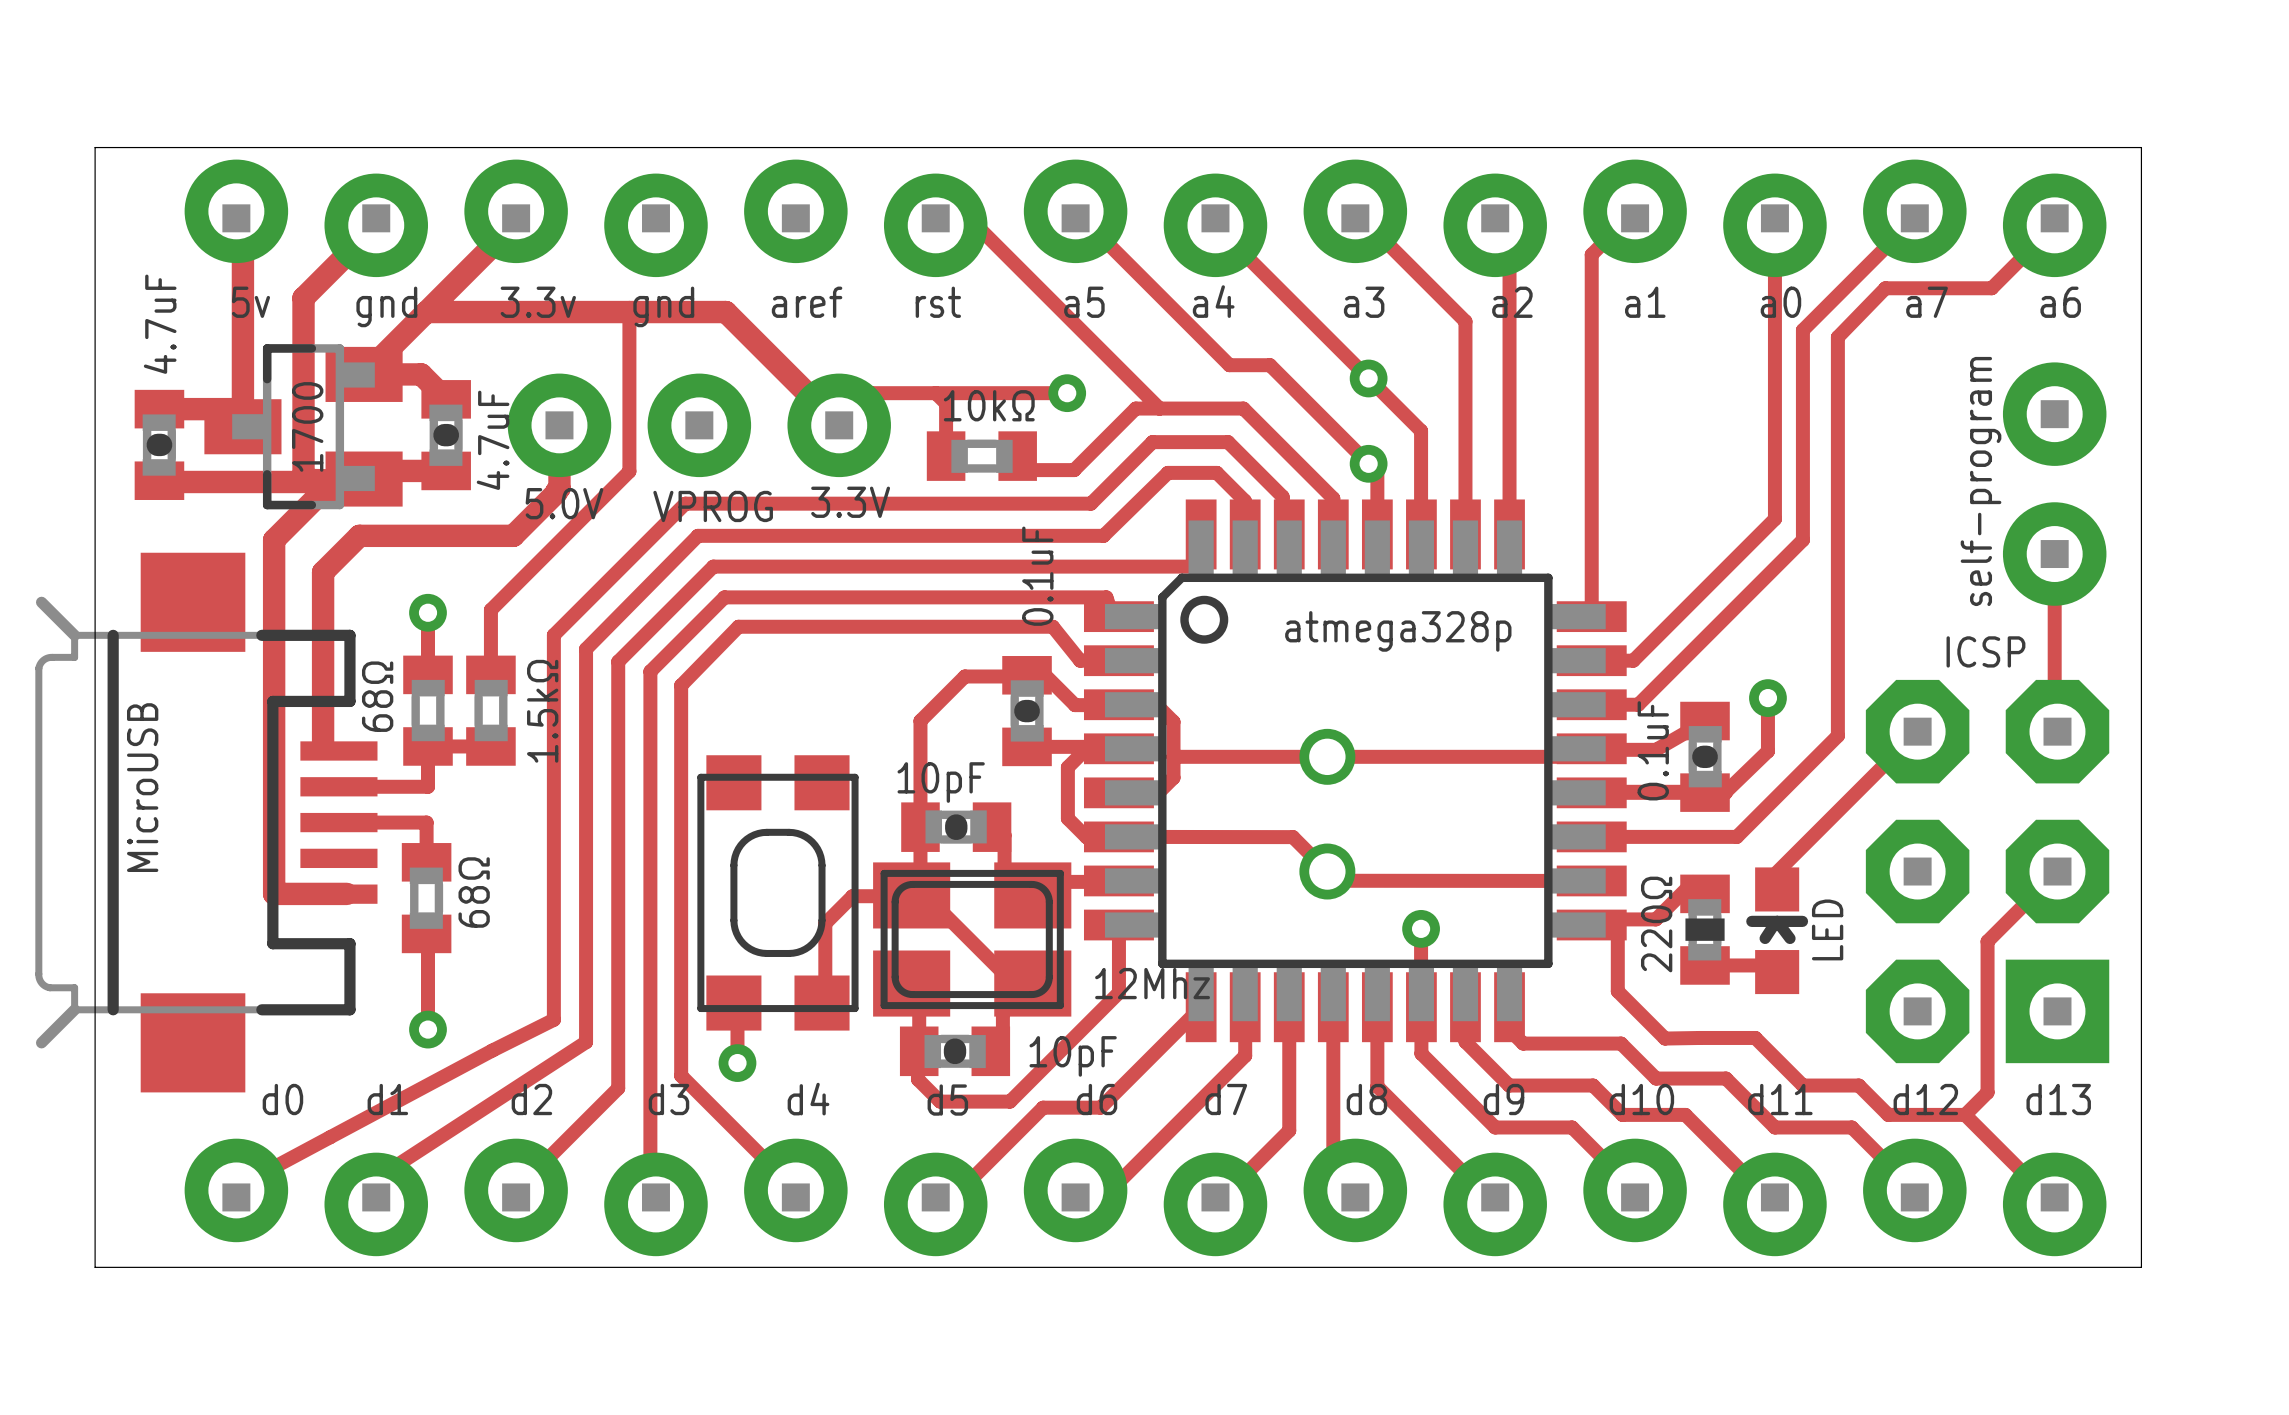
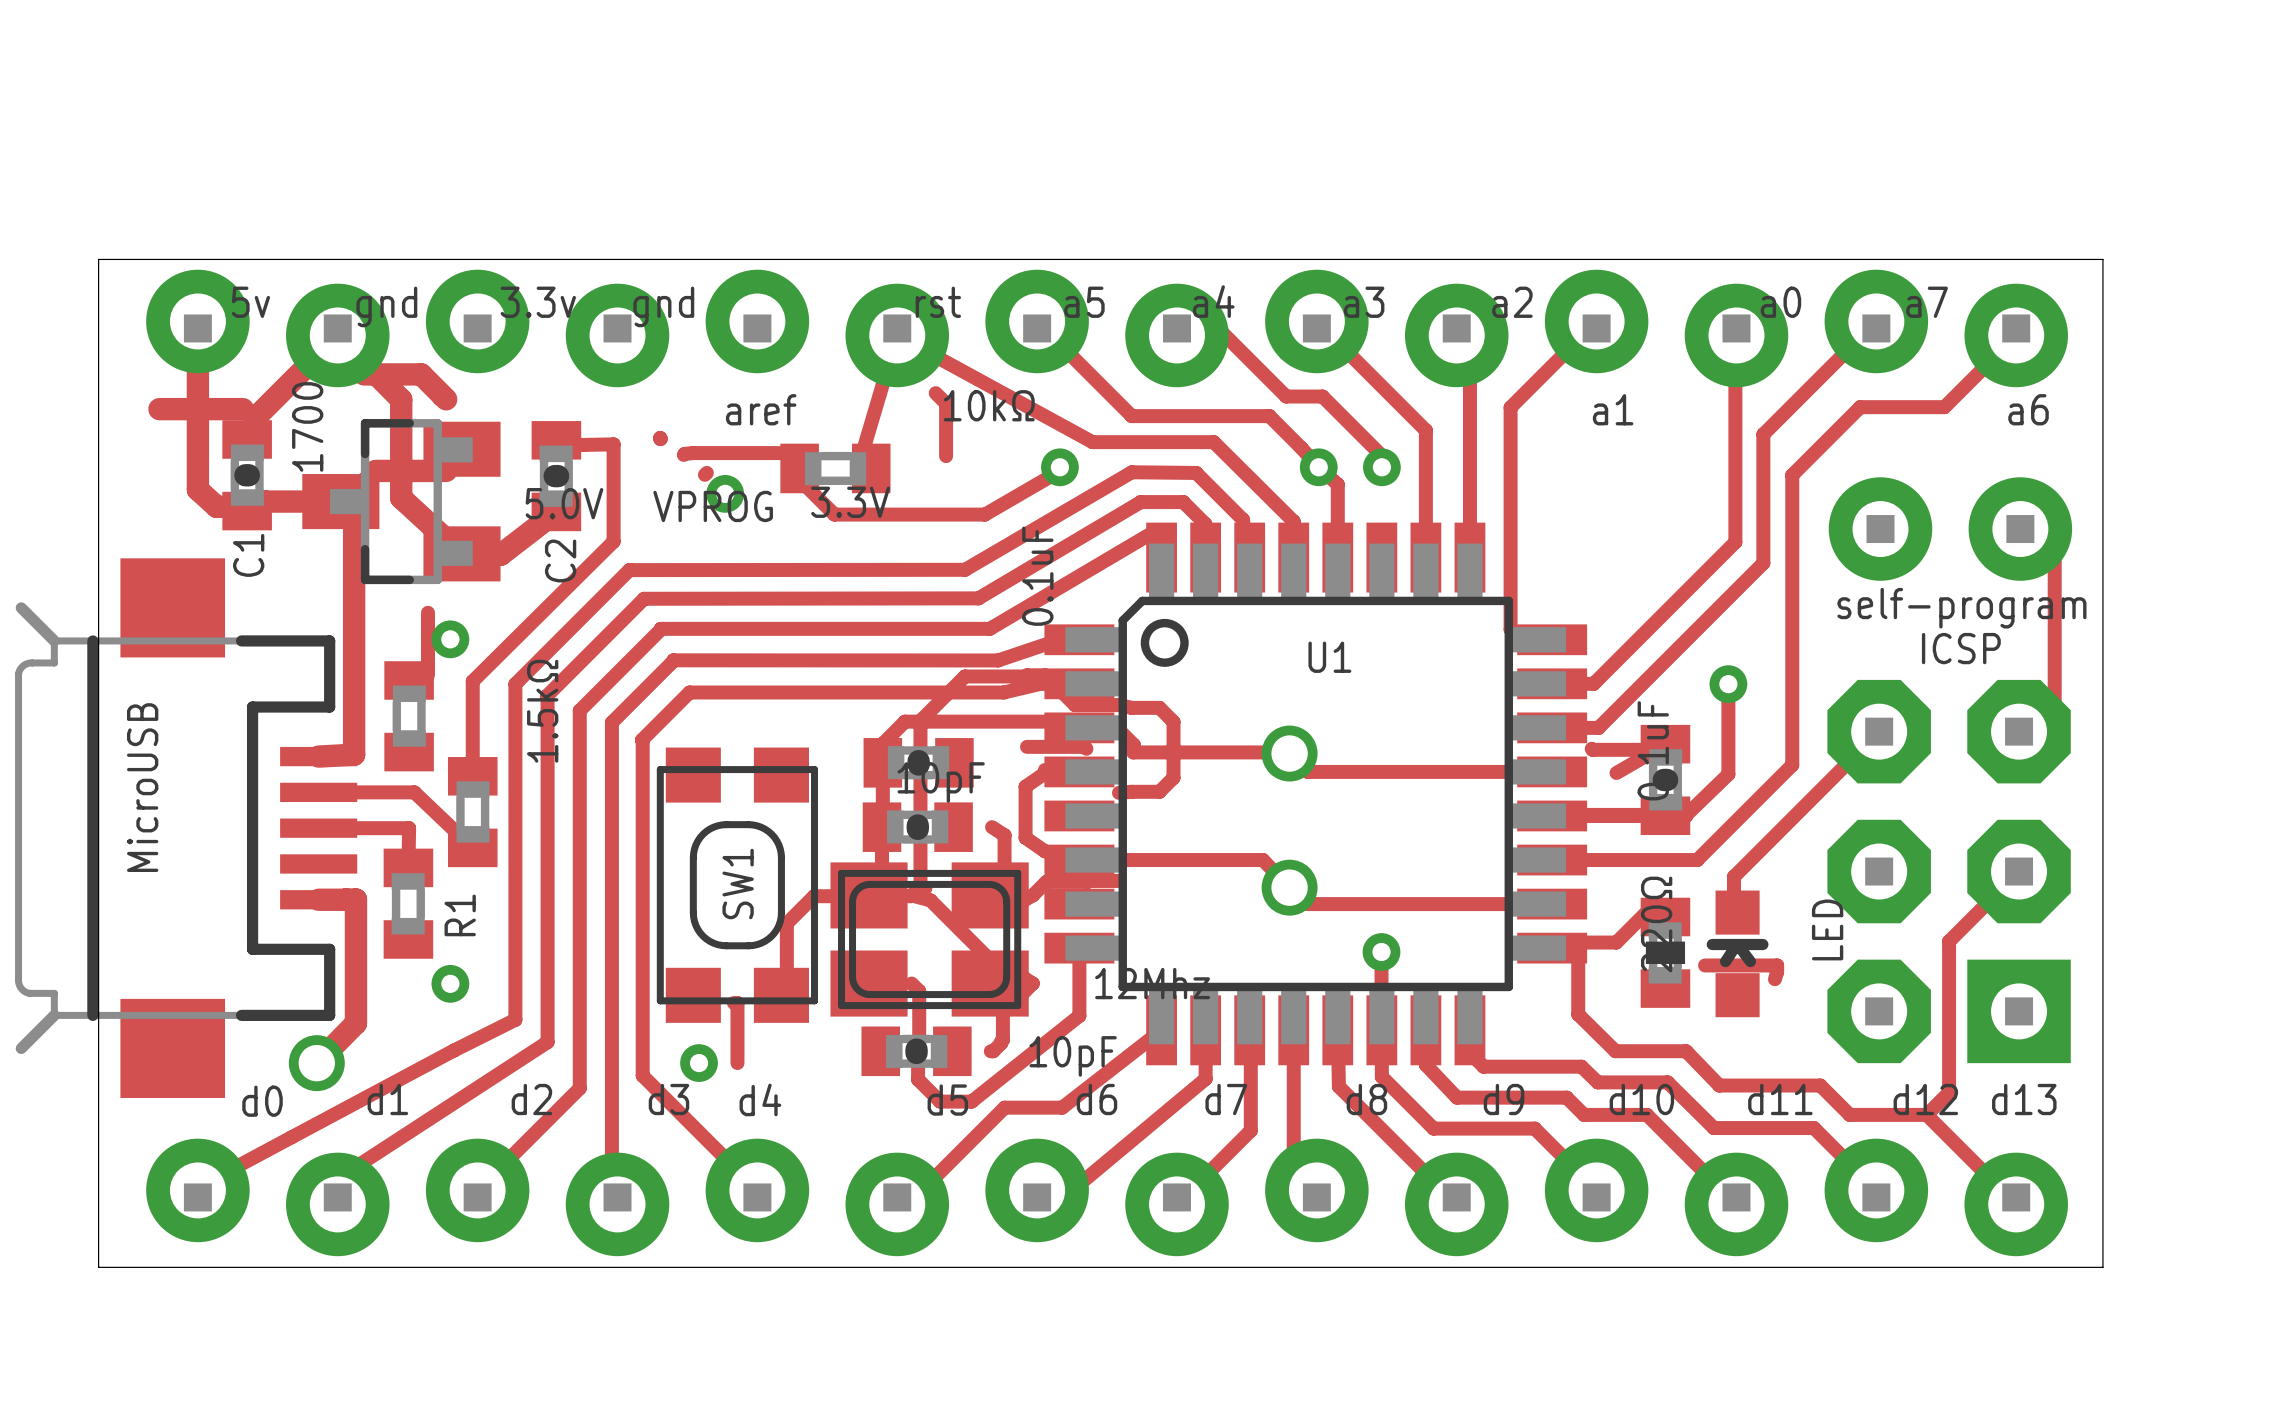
track: (236, 211) (242, 217) (242, 426) -> none
track: (516, 211) (516, 222) (364, 374) (364, 363) -> none
track: (1075, 211) (1229, 365) (1270, 365) (1377, 472) (1377, 534) -> none
track: (1355, 211) (1465, 321) (1465, 534) -> none
track: (1635, 211) (1591, 254) (1591, 616) -> none
part position: (1145, 218) -> (1107, 328)
track: (1914, 218) (1802, 330) (1802, 540) (1638, 704) (1591, 704) -> none
track: (376, 225) (303, 298) (303, 479) (364, 479) -> none
track: (942, 225) (976, 225) (1159, 408) -> none
track: (1215, 225) (1421, 430) (1421, 534) -> none
track: (1495, 225) (1509, 225) (1509, 534) -> none
track: (1774, 225) (1774, 519) (1633, 660) (1591, 660) -> none
track: (2054, 225) (1991, 288) (1885, 288) (1837, 337) (1837, 735) (1736, 836) (1591, 836) -> none
text position: aref (807, 302) -> aref (761, 409)
text position: a1 (1645, 302) -> a1 (1613, 409)
text position: a6 (2060, 302) -> a6 (2028, 409)
track: (426, 312) (725, 312) (839, 425) (871, 393) (1067, 393) -> none
track: (629, 312) (629, 471) (490, 609) (490, 674) -> none
track: none -> (197, 321) (197, 489) (216, 506) (257, 506) (247, 511) (265, 501) (340, 501) (354, 507) (354, 754) (318, 756)
track: none -> (1037, 321) (1131, 416) (1269, 416) (1337, 484) (1337, 557)
track: none -> (1316, 321) (1425, 430) (1425, 557)
track: none -> (1596, 321) (1510, 407) (1510, 629) (1514, 633) (1527, 633) (1533, 639) (1552, 639)
track: none -> (1876, 321) (1763, 434) (1763, 563) (1598, 727) (1552, 727)
text: 4.7uF (160, 324) -> none
track: none -> (1222, 332) (1286, 396) (1322, 396) (1381, 455) (1380, 457) (1381, 467)
track: none -> (1456, 335) (1469, 348) (1469, 557)
track: none -> (1736, 335) (1735, 542) (1593, 683) (1552, 683)
track: none -> (2016, 335) (1944, 407) (1860, 407) (1792, 475) (1792, 765) (1697, 860) (1552, 860)
via: (1368, 378) -> none
via position: (1067, 393) -> (1059, 467)
track: (559, 425) (559, 488) (513, 535) (359, 535) (323, 572) (323, 746) (338, 750) -> none
part: (699, 425) -> none
part position: (303, 426) -> (401, 501)
part: (446, 435) -> none
track: none -> (661, 438) (660, 439)
track: none -> (247, 439) (258, 415) (337, 335) (401, 399) (401, 497) (461, 553) (500, 554) (556, 511)
text: 4.7uF (493, 440) -> none
track: none -> (556, 440) (551, 444) (613, 444) (613, 541) (472, 681) (472, 776)
track: (1152, 442) (1090, 503) (685, 503) (553, 635) (553, 1019) (492, 1050) (251, 1179) (236, 1190) -> (1152, 442) (1092, 442) (897, 335) (860, 460) (871, 468)
track: (1213, 442) (1228, 442) (1282, 496) (1285, 530) (1289, 534) -> (1213, 442) (1293, 521) (1293, 557)
part position: (159, 444) -> (247, 475)
track: none -> (683, 454) (693, 453) (794, 453) (804, 464) (799, 468) (797, 465) (788, 468) (834, 514) (984, 514) (1061, 470) (1059, 467)
part position: (981, 456) -> (835, 468)
track: (1017, 456) (1031, 470) (1074, 470) (1135, 408) (1243, 408) (1333, 498) (1333, 534) -> none
via position: (1368, 463) -> (1381, 467)
via: none -> (1318, 467)
track: none -> (706, 472) (704, 474)
part: none -> (556, 476)
track: (364, 479) (335, 479) (274, 540) (274, 893) (346, 893) (338, 894) -> none
track: (159, 480) (163, 490) (171, 481) (332, 481) -> none
text rotation: 0° (1981, 481) -> 90° clockwise (1961, 608)
part rotation: 0° (2054, 484) -> 90° clockwise (1950, 529)
via: none -> (725, 493)
track: (1201, 534) (1201, 513) (1202, 566) (713, 566) (618, 661) (618, 1088) (516, 1190) -> none
track: (1244, 534) (1244, 500) (1216, 472) (1167, 472) (1103, 535) (697, 535) (586, 649) (586, 1042) (377, 1177) (376, 1204) -> none
text: none -> C1 (248, 555)
track: none -> (1161, 557) (1152, 532) (989, 628) (660, 628)
track: none -> (1205, 557) (1205, 524) (1183, 502) (1140, 502) (978, 598) (644, 598) (546, 695)
track: none -> (1249, 557) (1245, 553) (1243, 519) (1196, 472) (1131, 472) (965, 569) (629, 570) (515, 684) (515, 1019) (453, 1050) (213, 1179) (197, 1190)
text: none -> C2 (560, 561)
via position: (427, 612) -> (450, 639)
track: (1118, 616) (1111, 623) (1111, 612) (1106, 597) (724, 597) (650, 671) (650, 1203) (655, 1204) -> none
track: none -> (660, 629) (579, 710) (579, 1088) (477, 1190)
text: atmega328p (1398, 631) -> U1 (1329, 657)
track: none -> (1079, 639) (1072, 647) (1072, 635) (998, 660) (673, 660)
text position: ICSP (1985, 651) -> ICSP (1961, 648)
track: (1118, 660) (1080, 660) (1052, 626) (738, 626) (681, 685) (681, 1075) (795, 1190) -> none
track: none -> (673, 661) (611, 722) (611, 1203) (617, 1204)
track: none -> (1079, 683) (1040, 683) (1003, 692) (689, 692) (642, 740)
track: none -> (1728, 684) (1728, 774) (1686, 814) (1539, 814) (1686, 815) (1665, 815)
text: 68Ω (377, 696) -> none
track: none -> (547, 696) (547, 1042) (339, 1177) (337, 1204)
track: (1767, 698) (1767, 751) (1725, 791) (1579, 791) (1725, 792) (1705, 792) -> none
via position: (1767, 698) -> (1728, 684)
part position: (427, 710) -> (409, 716)
part position: (490, 710) -> (472, 812)
part: (1027, 711) -> none
track: none -> (1879, 731) (1733, 876) (1733, 924) (1737, 912)
track: (1917, 731) (1773, 875) (1773, 901) (1777, 889) -> none
track: none -> (642, 740) (642, 1075) (757, 1190)
track: (492, 746) (427, 746) (427, 786) (338, 786) -> none
track: (1118, 748) (1086, 748) (1067, 767) (1067, 818) (1086, 837) (1118, 837) -> none
track: (1579, 749) (1591, 748) (1591, 756) (1173, 756) -> none
via position: (1327, 756) -> (1289, 753)
part position: (1705, 756) -> (1665, 779)
part: none -> (918, 762)
track: none -> (1044, 769) (1046, 771) (1025, 786) (1025, 837) (1044, 851) (1079, 860)
part position: (1355, 770) -> (1315, 793)
track: none -> (1539, 772) (1552, 771) (1307, 771) (1288, 752) (1133, 752) (1133, 744) (1119, 731) (1091, 731) (1079, 727) (1073, 721) (904, 721) (882, 743) (882, 886) (869, 895) (886, 888)
track: none -> (318, 792) (414, 792) (472, 847)
part position: (206, 822) -> (186, 828)
track: (338, 822) (426, 822) (426, 862) -> none
part: none -> (917, 827)
part: (956, 827) -> none
track: none -> (318, 828) (409, 828) (408, 867)
track: (1118, 836) (1292, 837) (1336, 880) (1591, 880) -> none
track: none -> (1079, 860) (1262, 860) (1307, 904) (1552, 904)
via position: (1327, 871) -> (1289, 887)
part position: (1987, 871) -> (1949, 871)
track: none -> (2019, 871) (1949, 941) (1949, 1092) (1926, 1114) (2016, 1204)
track: (2057, 871) (1987, 941) (1987, 1092) (1965, 1114) -> none
track: (1693, 881) (1655, 919) (1617, 919) -> (1653, 905) (1616, 942) (1578, 942)
text: none -> SW1 (738, 884)
text: 68Ω (474, 892) -> R1 (460, 915)
part position: (777, 892) -> (737, 885)
track: (852, 896) (825, 923) (825, 1003) (822, 1003) -> (852, 896) (814, 896) (786, 923) (786, 1003) (781, 995)
part position: (426, 898) -> (408, 903)
track: none -> (318, 899) (355, 899) (355, 1023) (316, 1063)
track: (1617, 919) (1617, 991) (1665, 1038) (1755, 1037) (1802, 1085) -> (1578, 942) (1578, 1014) (1615, 1051) (1686, 1051) (1719, 1085) (1802, 1085)
track: (1118, 925) (1118, 992) (1010, 1101) (971, 1101) -> (1079, 948) (1079, 1015) (971, 1101)
track: (1421, 928) (1421, 1053) (1495, 1127) (1572, 1127) (1635, 1190) -> none
via position: (1421, 928) -> (1381, 952)
part position: (1705, 929) -> (1665, 952)
part position: (1777, 930) -> (1737, 953)
track: (426, 933) (427, 1029) (425, 1030) -> none
part position: (972, 939) -> (929, 939)
track: none -> (1381, 952) (1381, 1076) (1433, 1128) (1534, 1128) (1596, 1190)
track: (1201, 1007) (1100, 1107) (1062, 1107) -> (1161, 1030) (1062, 1107)
track: (1245, 1007) (1245, 1055) (1110, 1190) (1075, 1190) -> none
track: (1289, 1007) (1289, 1130) (1215, 1204) -> none
track: (1333, 1007) (1333, 1189) (1355, 1190) -> none
track: (1377, 1007) (1377, 1086) (1495, 1204) -> none
track: (1465, 1007) (1465, 1041) (1509, 1085) (1593, 1085) (1622, 1114) -> (1425, 1030) (1425, 1064) (1456, 1097) (1566, 1097) (1584, 1114) (1622, 1114)
track: (1509, 1007) (1509, 1029) (1523, 1043) (1621, 1043) (1656, 1078) (1725, 1078) (1774, 1127) (1851, 1127) (1914, 1190) -> none
via position: (427, 1029) -> (450, 983)
track: none -> (1205, 1030) (1205, 1078) (1072, 1190) (1037, 1190)
track: none -> (1249, 1030) (1250, 1130) (1177, 1204)
track: none -> (1293, 1030) (1293, 1167) (1316, 1190)
track: none -> (1337, 1030) (1338, 1086) (1456, 1204)
track: none -> (1469, 1030) (1469, 1053) (1483, 1066) (1581, 1066) (1597, 1082) (1667, 1082) (1713, 1128) (1813, 1128) (1876, 1190)
part position: (955, 1051) -> (916, 1051)
via: none -> (316, 1063)
via position: (737, 1063) -> (699, 1063)
track: (1820, 1085) (1858, 1085) (1888, 1114) -> (1820, 1085) (1849, 1114) (1888, 1114)
text position: d0 (282, 1099) -> d0 (262, 1101)
text position: d4 (808, 1099) -> d4 (760, 1099)
text position: d13 (2058, 1099) -> d13 (2024, 1099)
track: (1043, 1107) (946, 1204) (935, 1204) -> (1043, 1107) (1004, 1107) (907, 1204) (897, 1204)
track: (1646, 1114) (1685, 1114) (1774, 1204) -> (1646, 1114) (1736, 1204)
track: (1926, 1114) (1965, 1114) -> none
track: (1965, 1114) (2054, 1204) -> none
part position: (1145, 1197) -> (1107, 1197)
board edge: (98, 1267) (95, 1267) (95, 147) (2141, 147) (2141, 1267) (2102, 1267) -> (98, 1267) (98, 259) (2102, 259) (2102, 1267)

